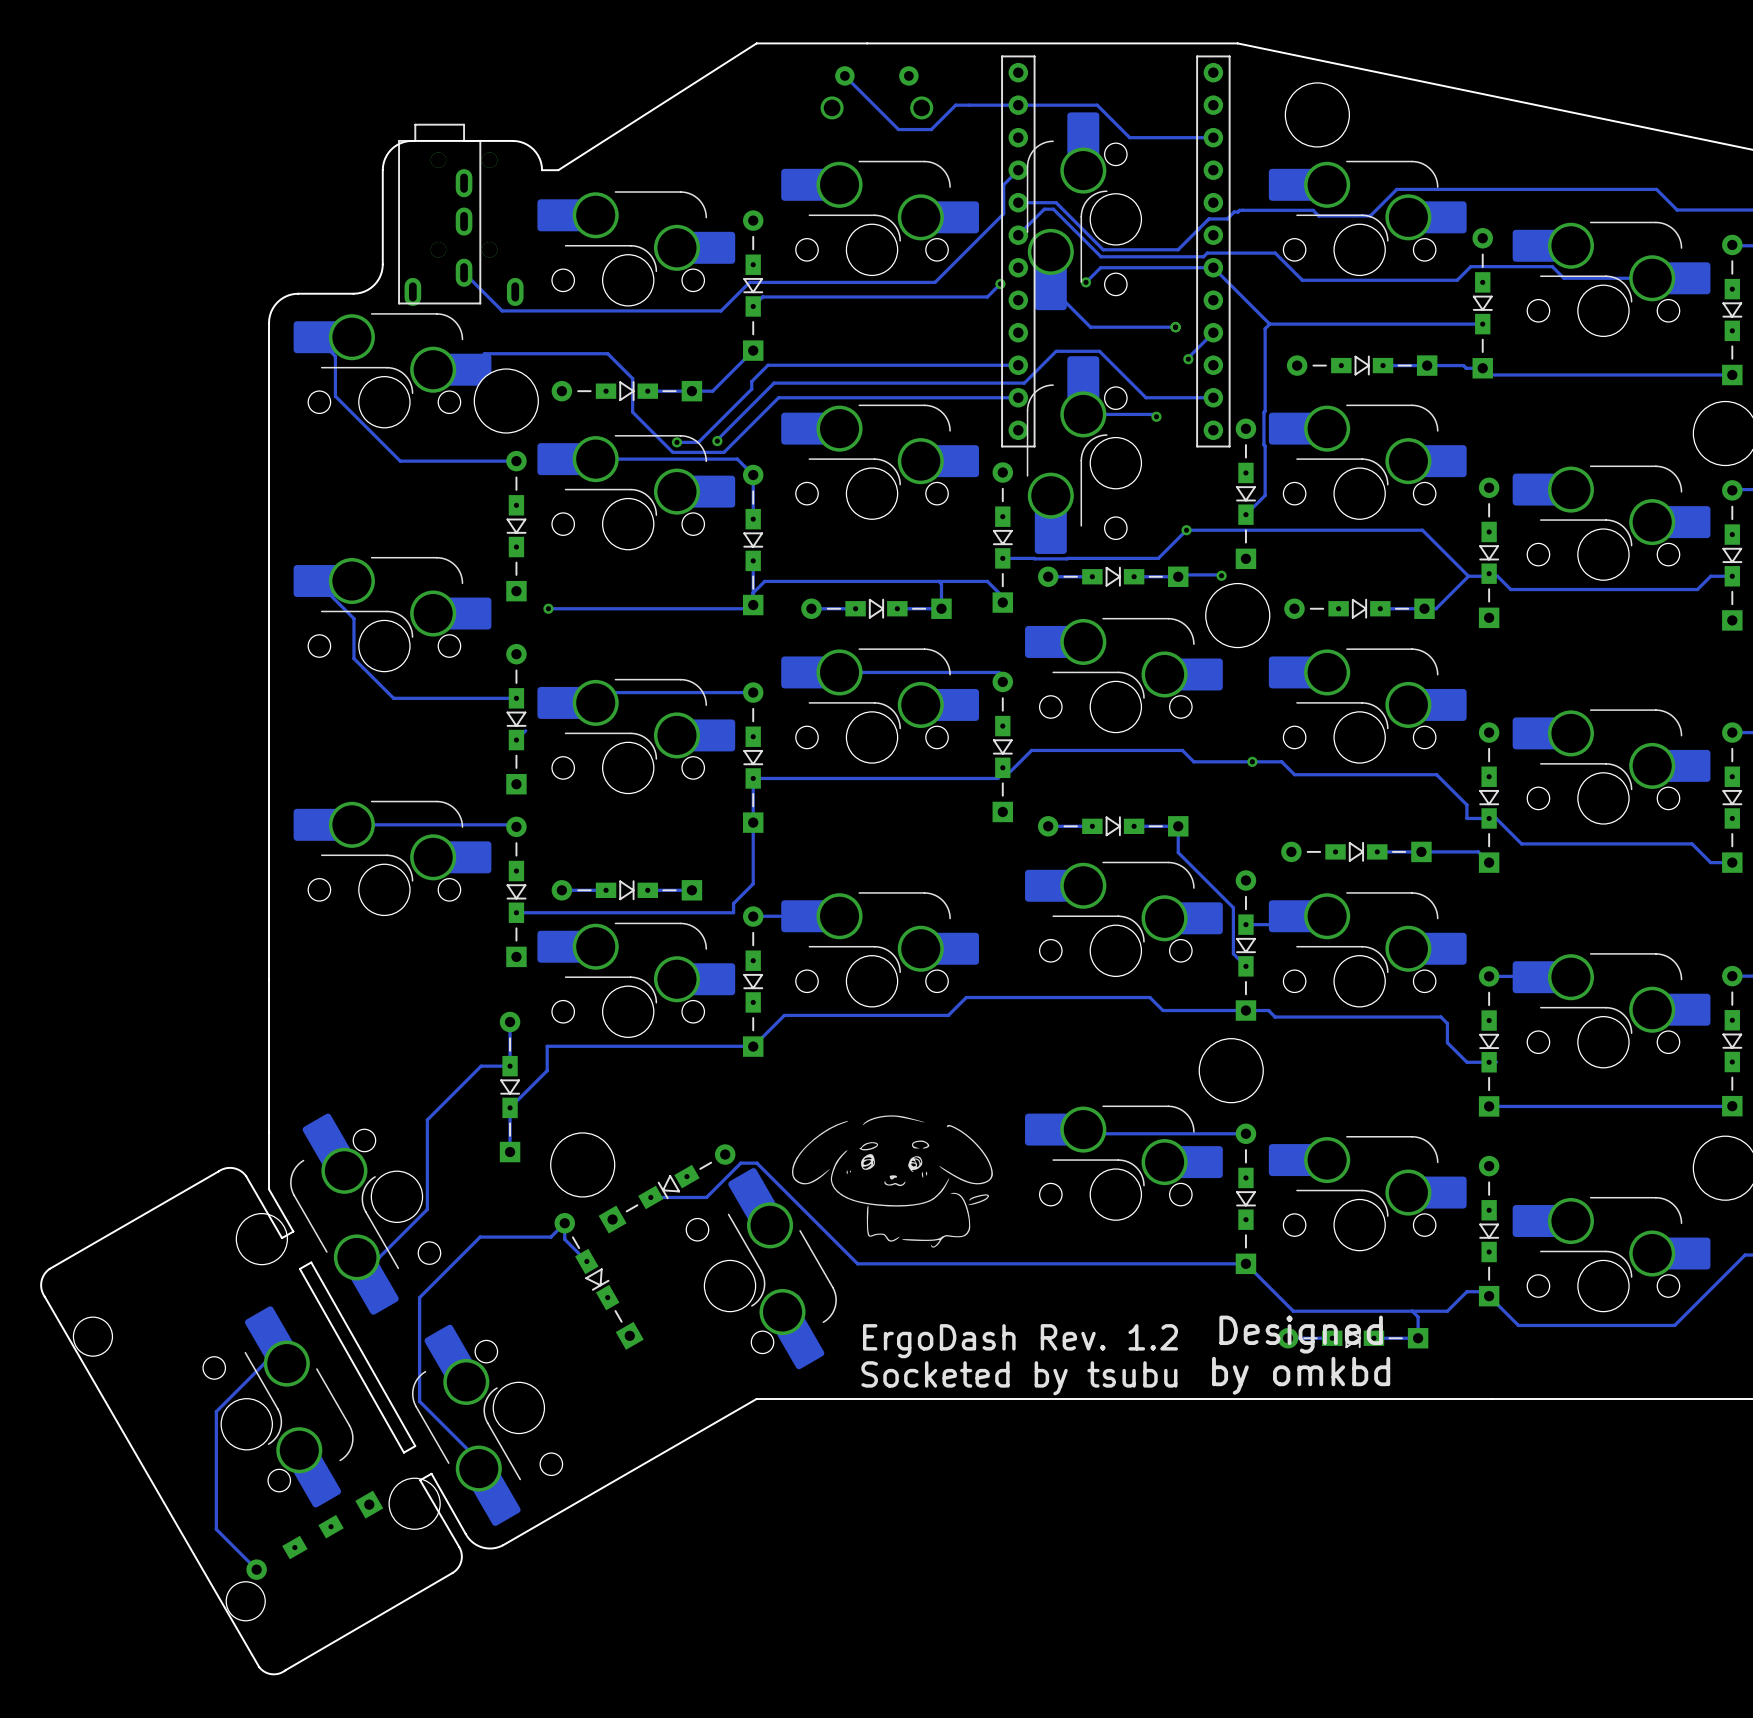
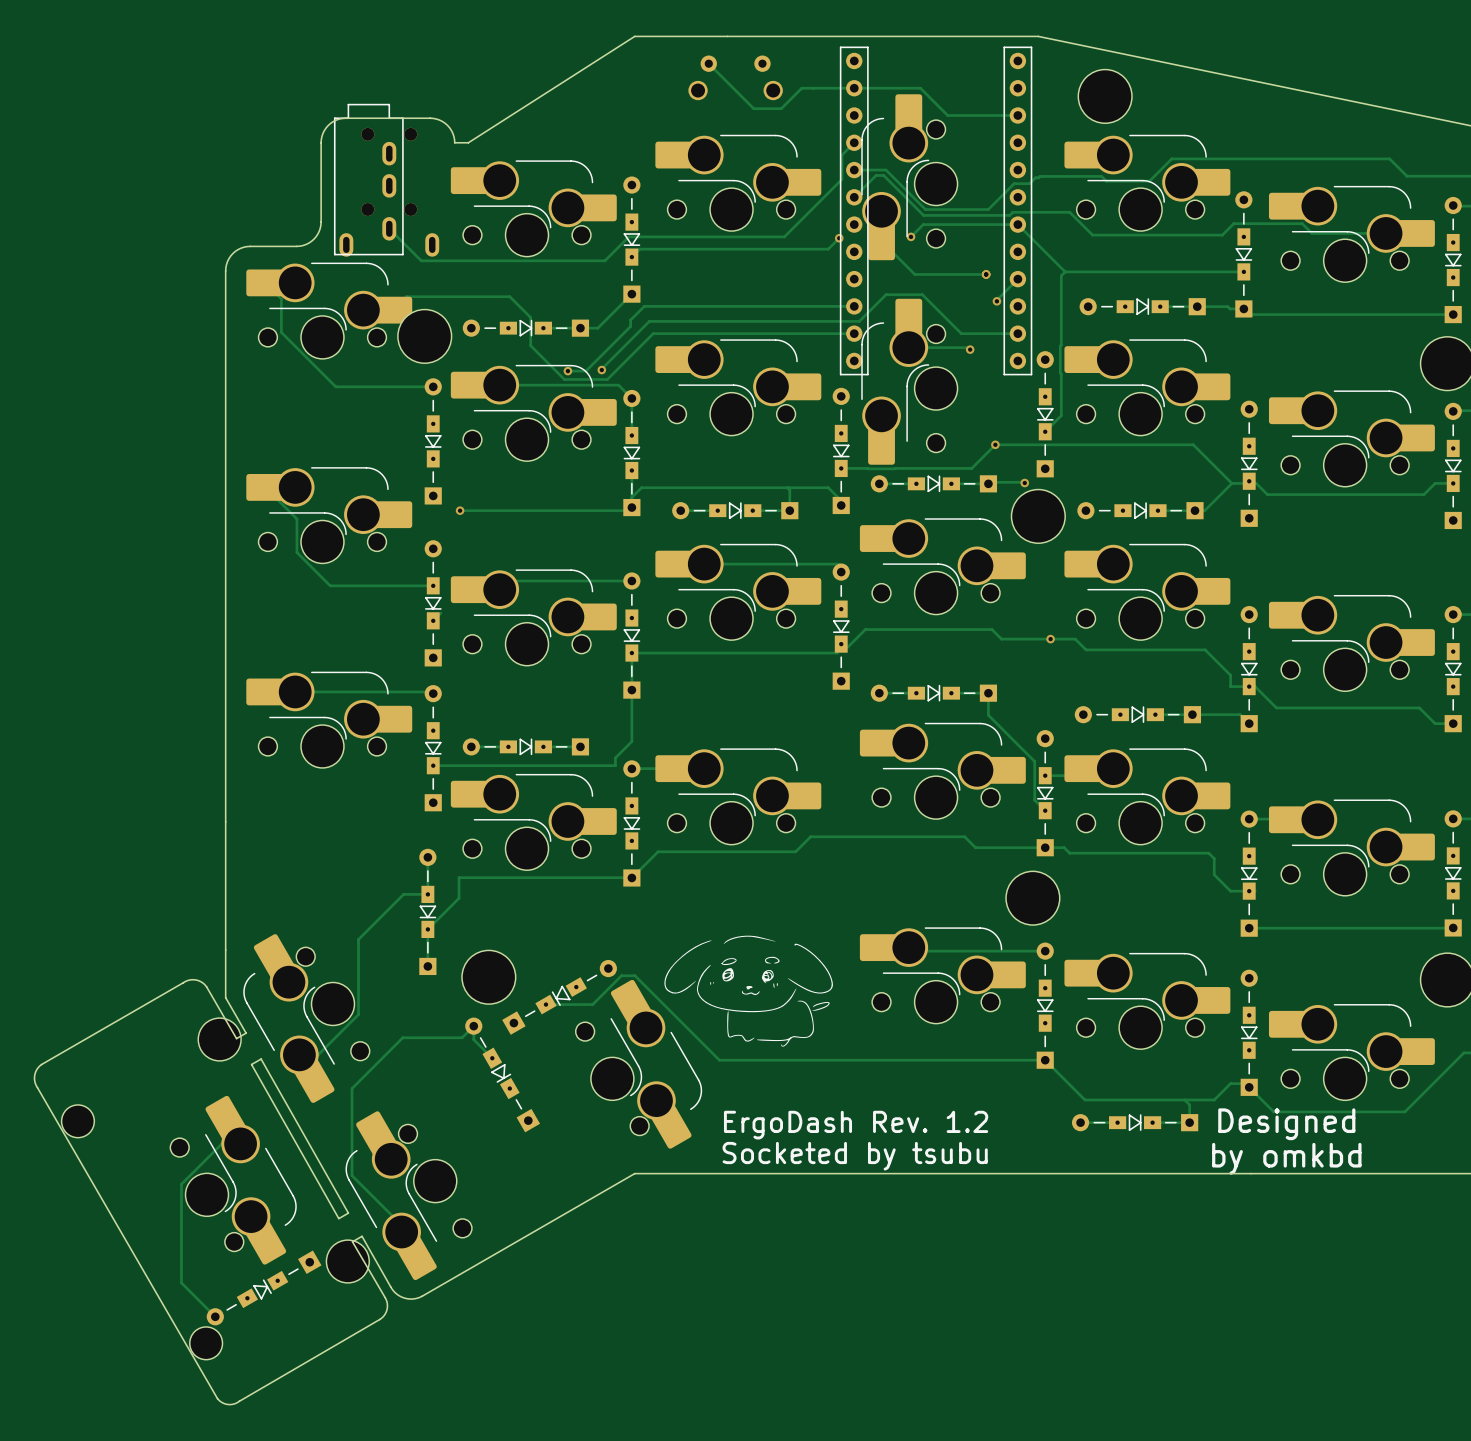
text position: Designed (1301, 1334) -> Designed (1286, 1124)
text position: by omkbd (1301, 1375) -> by omkbd (1286, 1158)
part footprint: [246, 1490, 384, 1580] -> [206, 1250, 322, 1326]

